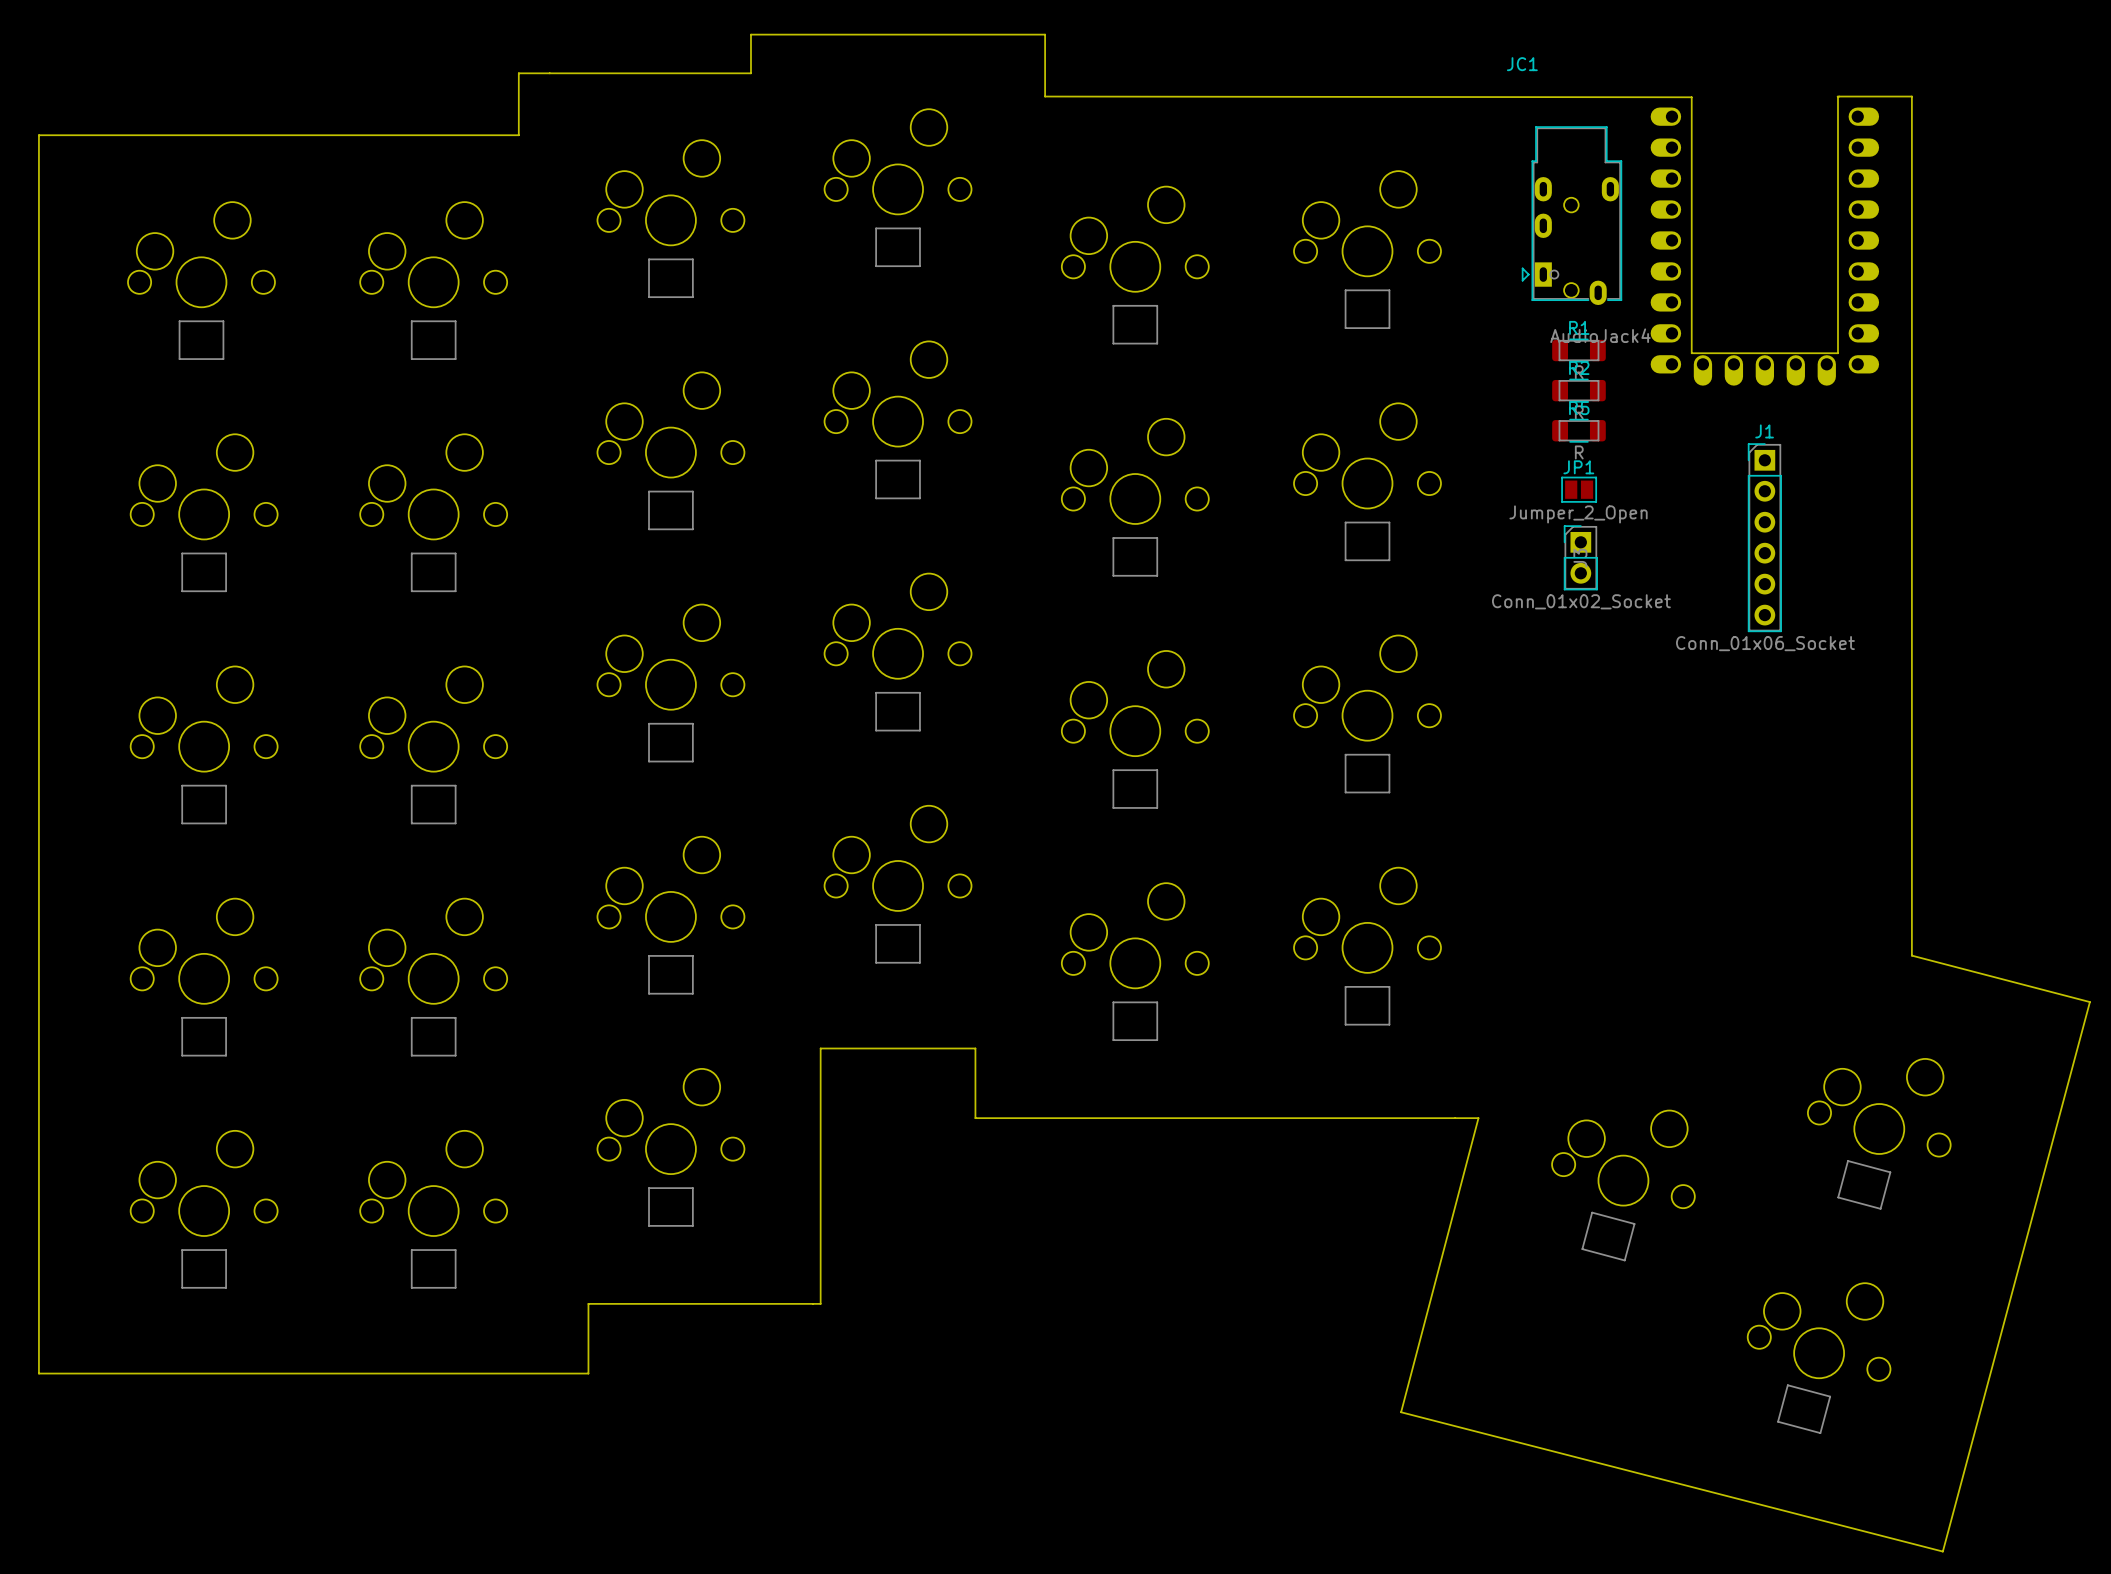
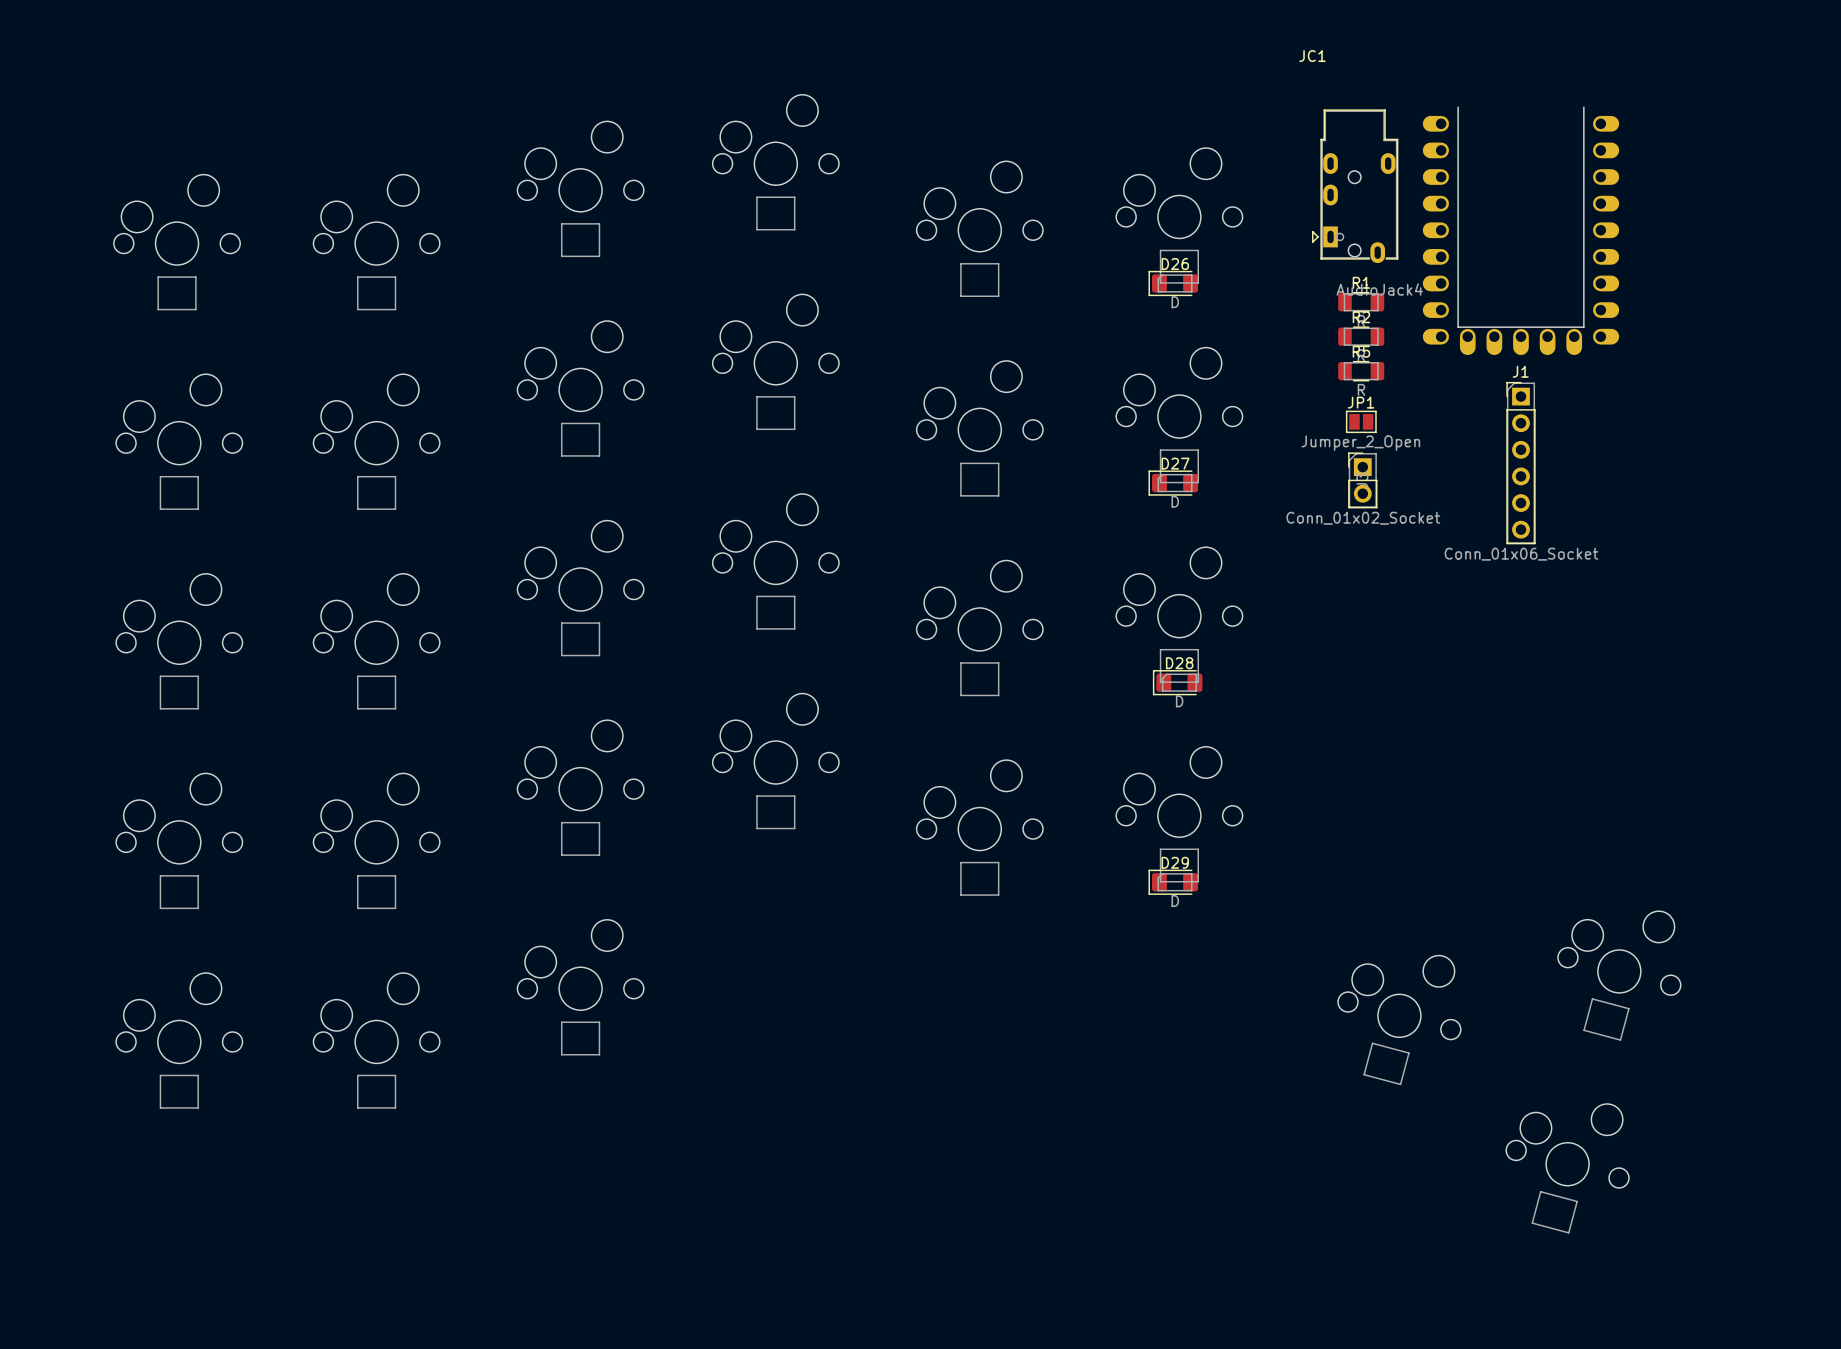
board edge: (1837, 96) (1911, 96) (1911, 955) (2089, 1002) (1942, 1551) (1401, 1412) (1478, 1118) (975, 1118) (975, 1048) (820, 1048) (820, 1303) (588, 1303) (588, 1373) (38, 1373) (38, 135) (518, 135) (518, 73) (750, 73) (750, 34) (1045, 34) (1045, 96) (1691, 97) -> none
part position: (1764, 241) -> (1520, 230)
D26: none -> D (1173, 283)
D27: none -> D (1173, 483)
D28: none -> D (1177, 682)
D29: none -> D (1173, 882)

